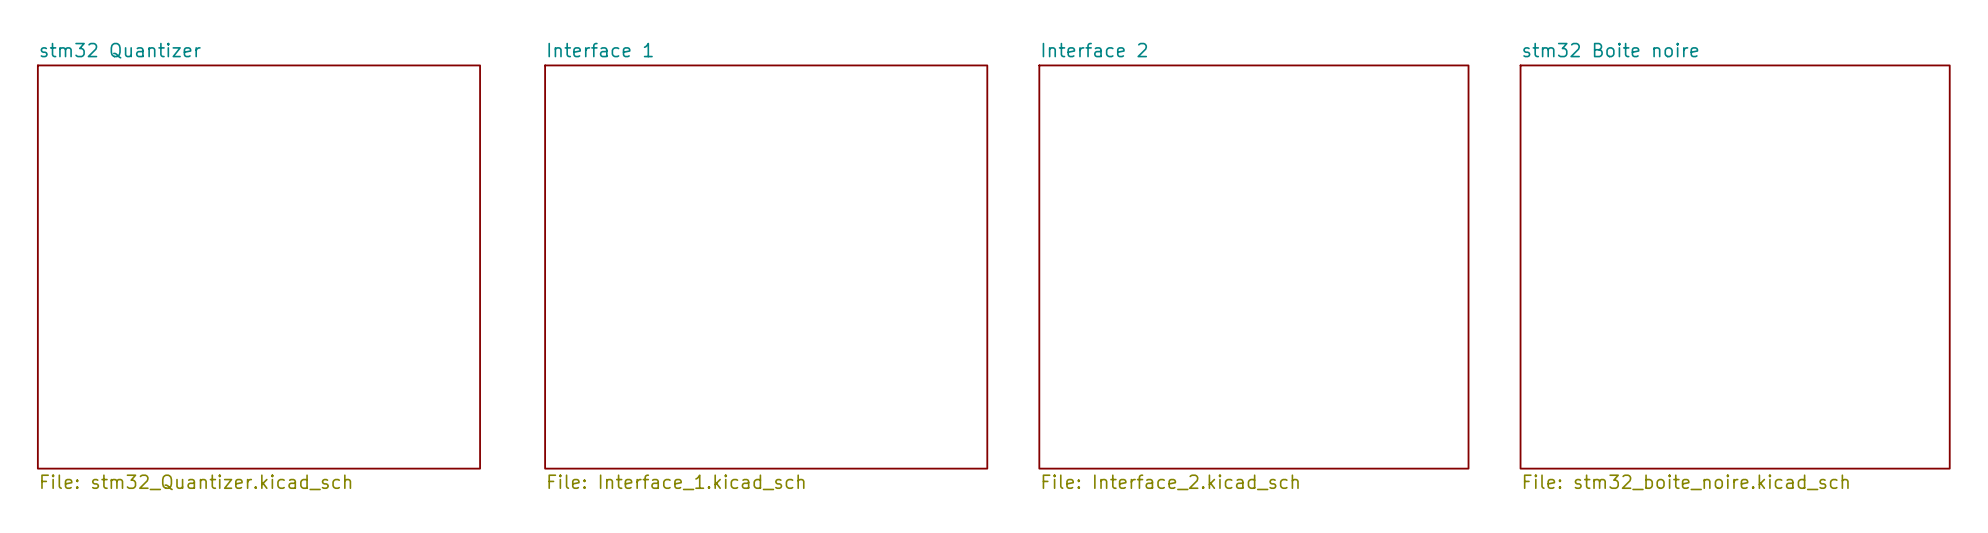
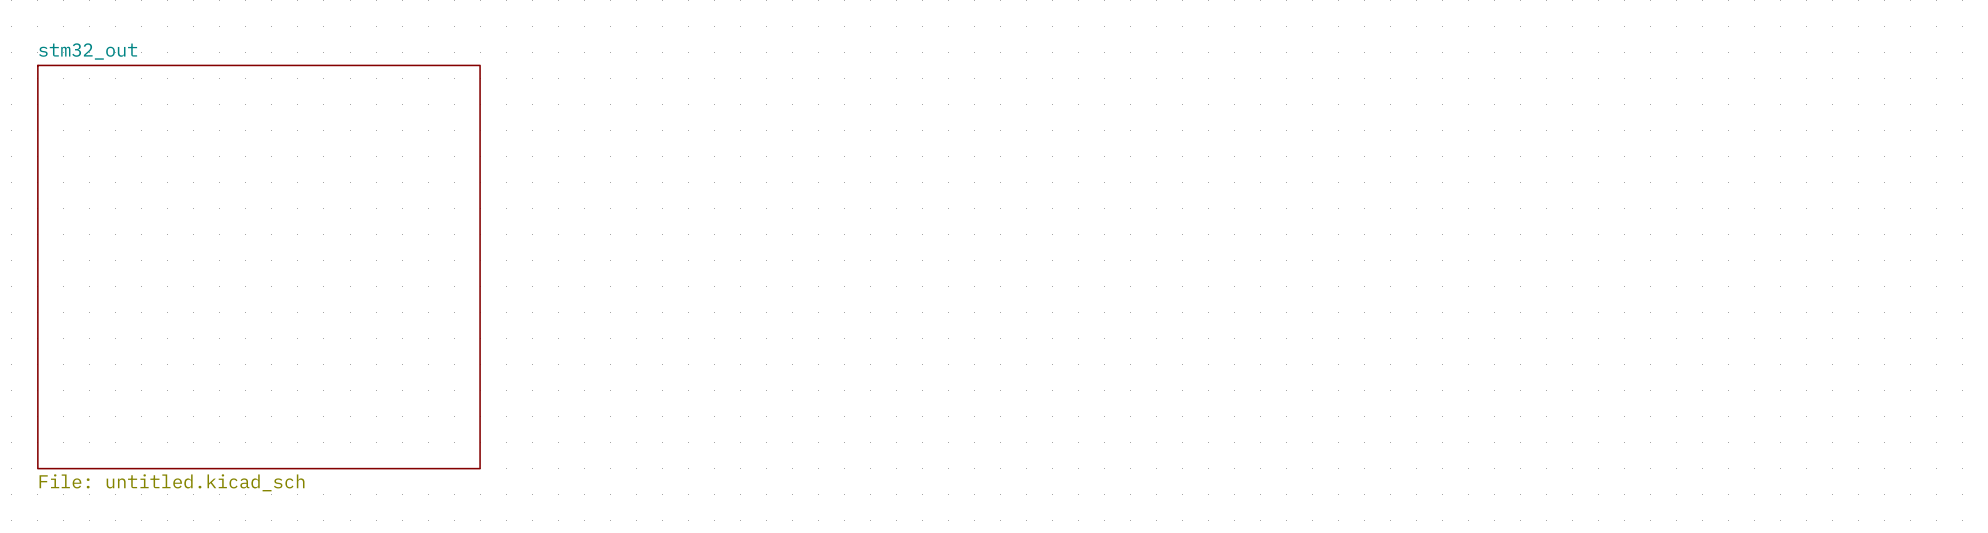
sheet stm32 Quantizer name: stm32 Quantizer (120, 50) -> stm32_out (88, 51)
sheet Interface 1: File: Interface_1.kicad_sch (766, 267) -> none
sheet Interface 2: File: Interface_2.kicad_sch (1253, 267) -> none
sheet stm32 Boite noire: File: stm32_boite_noire.kicad_sch (1735, 267) -> none
sheet stm32 Quantizer value: File: stm32_Quantizer.kicad_sch (196, 482) -> File: untitled.kicad_sch (172, 482)

